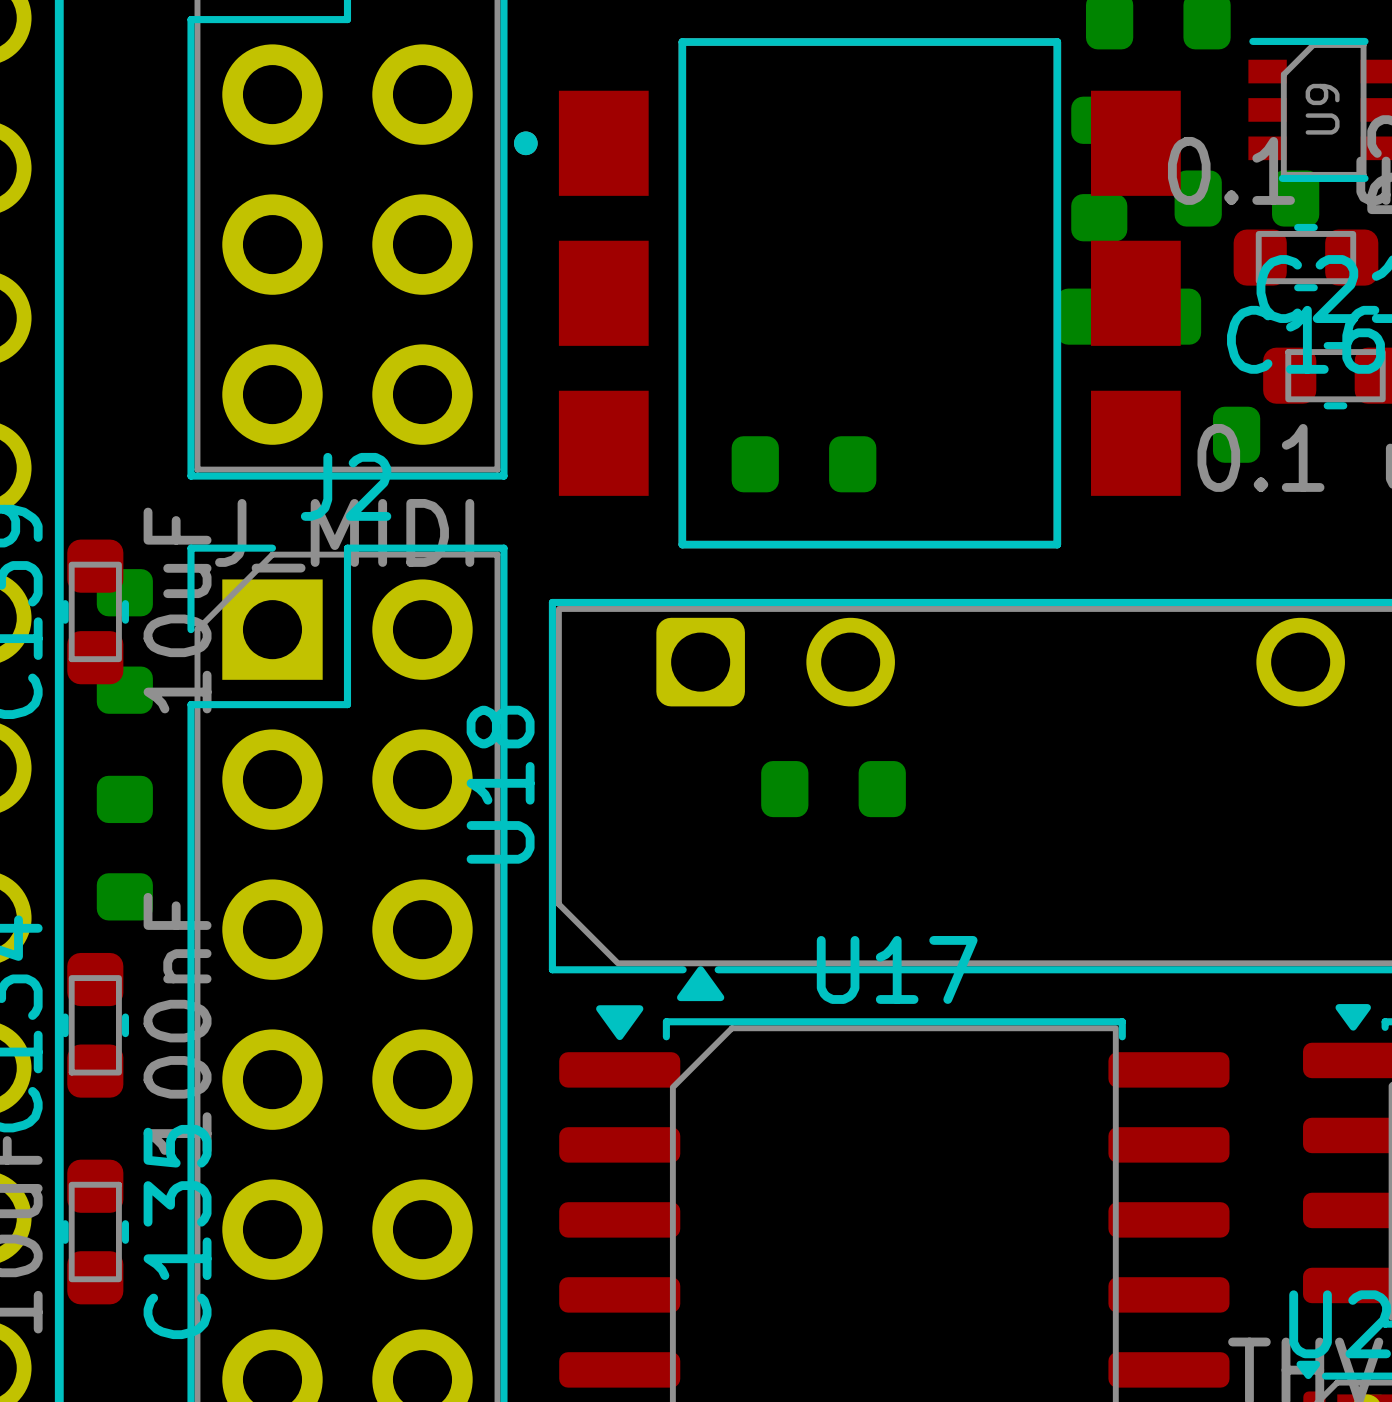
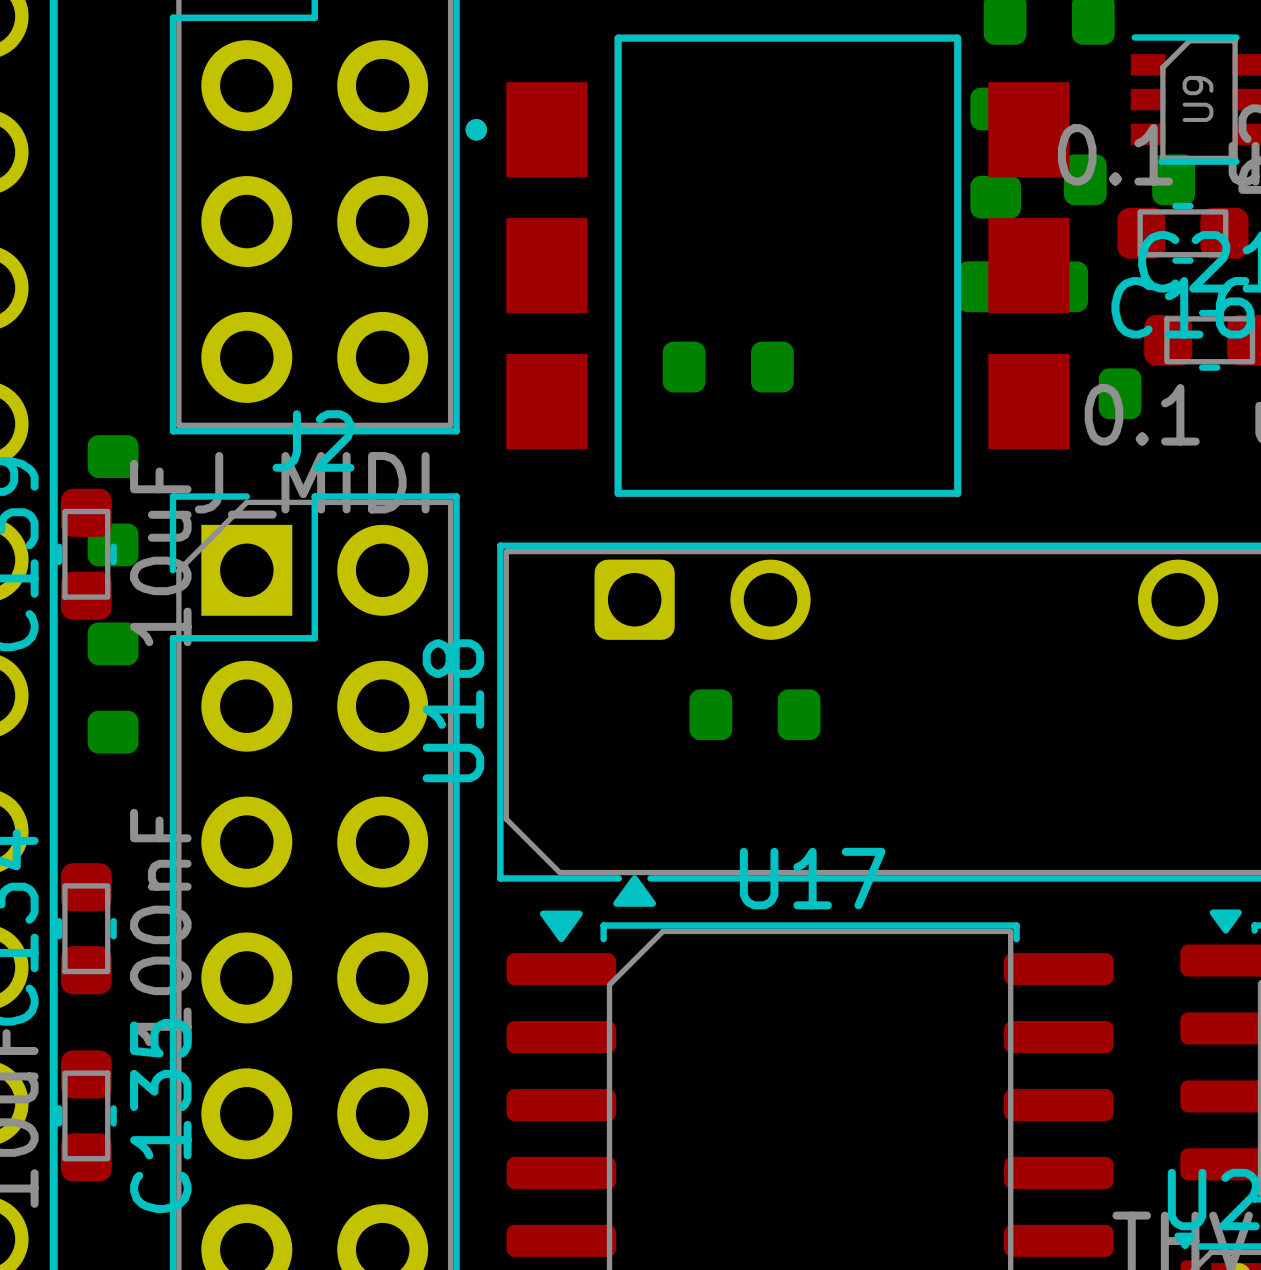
part position: (803, 464) -> (728, 367)
part: none -> (113, 500)
part: (124, 641) -> none
part: none -> (113, 688)
part: (124, 848) -> none

